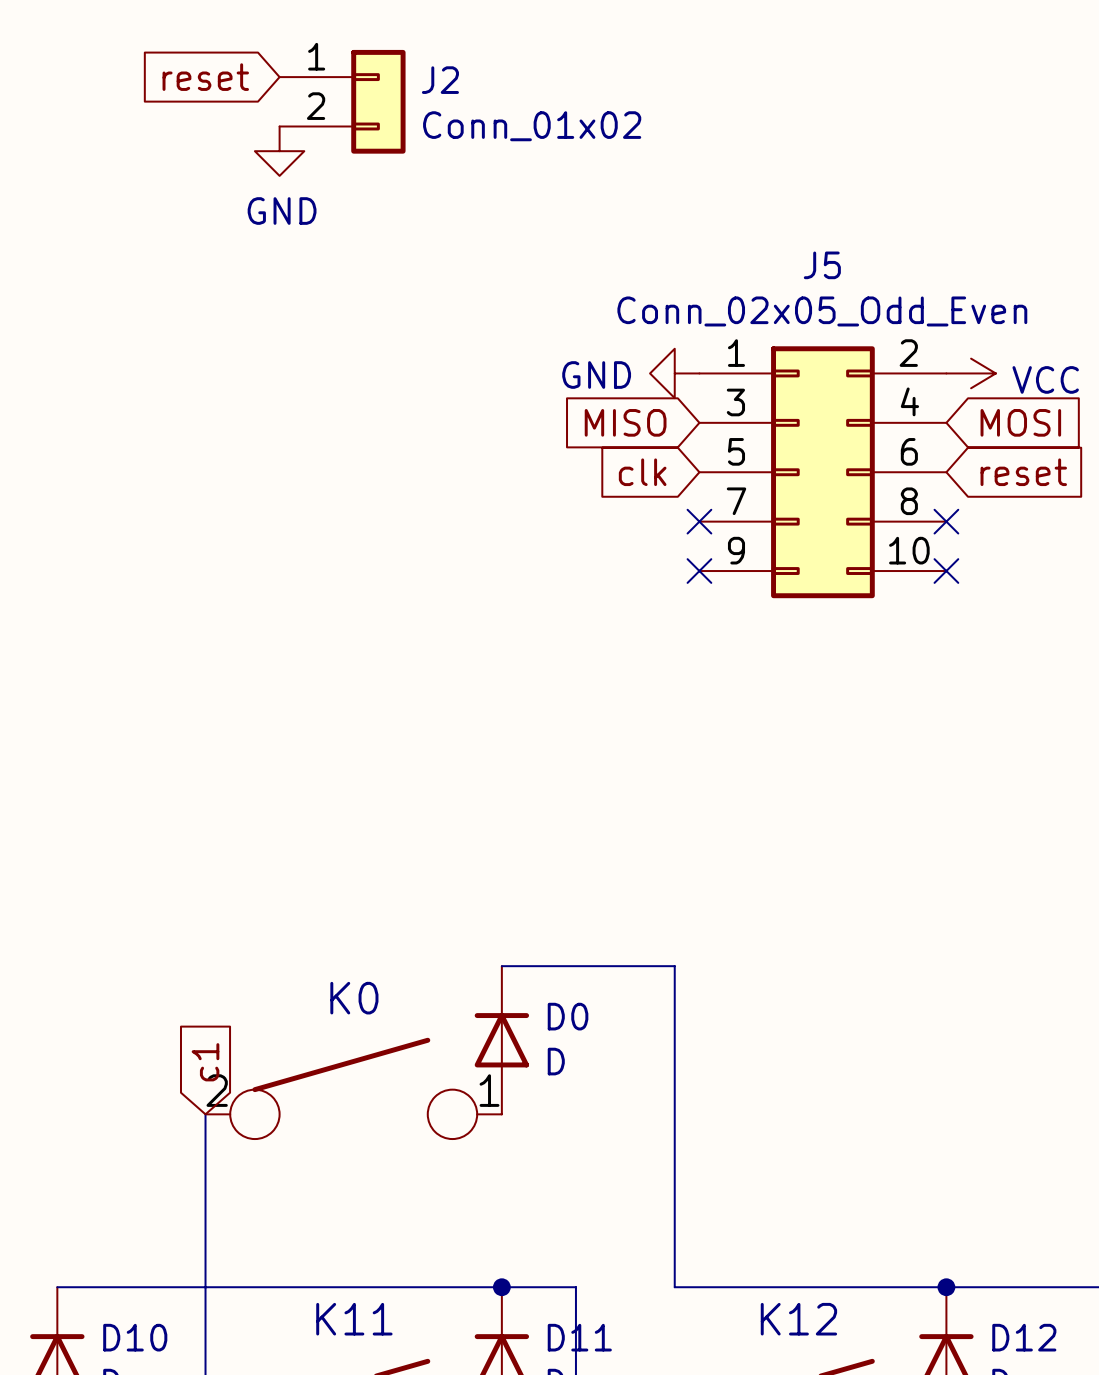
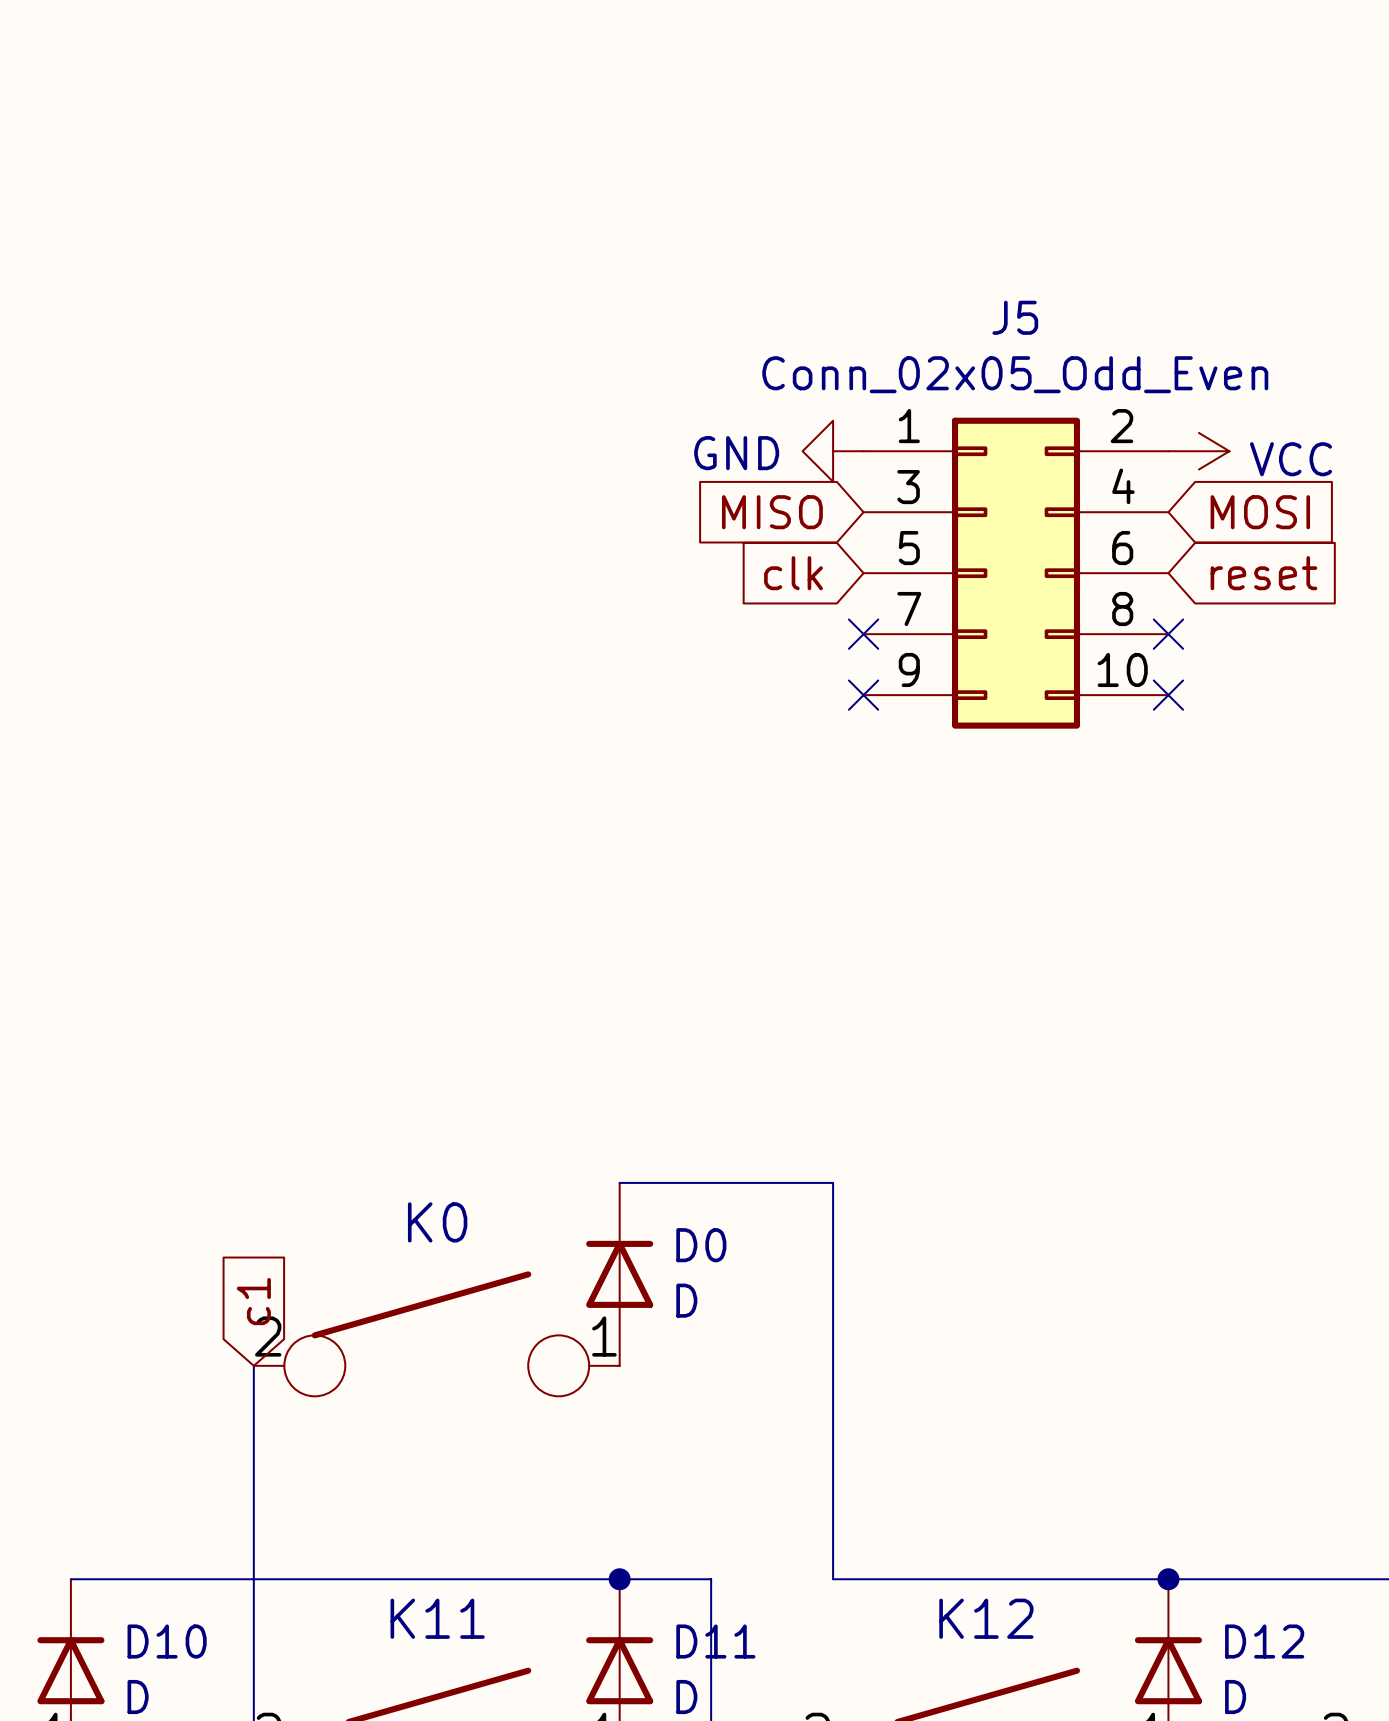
global label: reset (205, 77) -> none
J2: Conn_01x02 (342, 101) -> none
power symbol: GND (279, 151) -> none

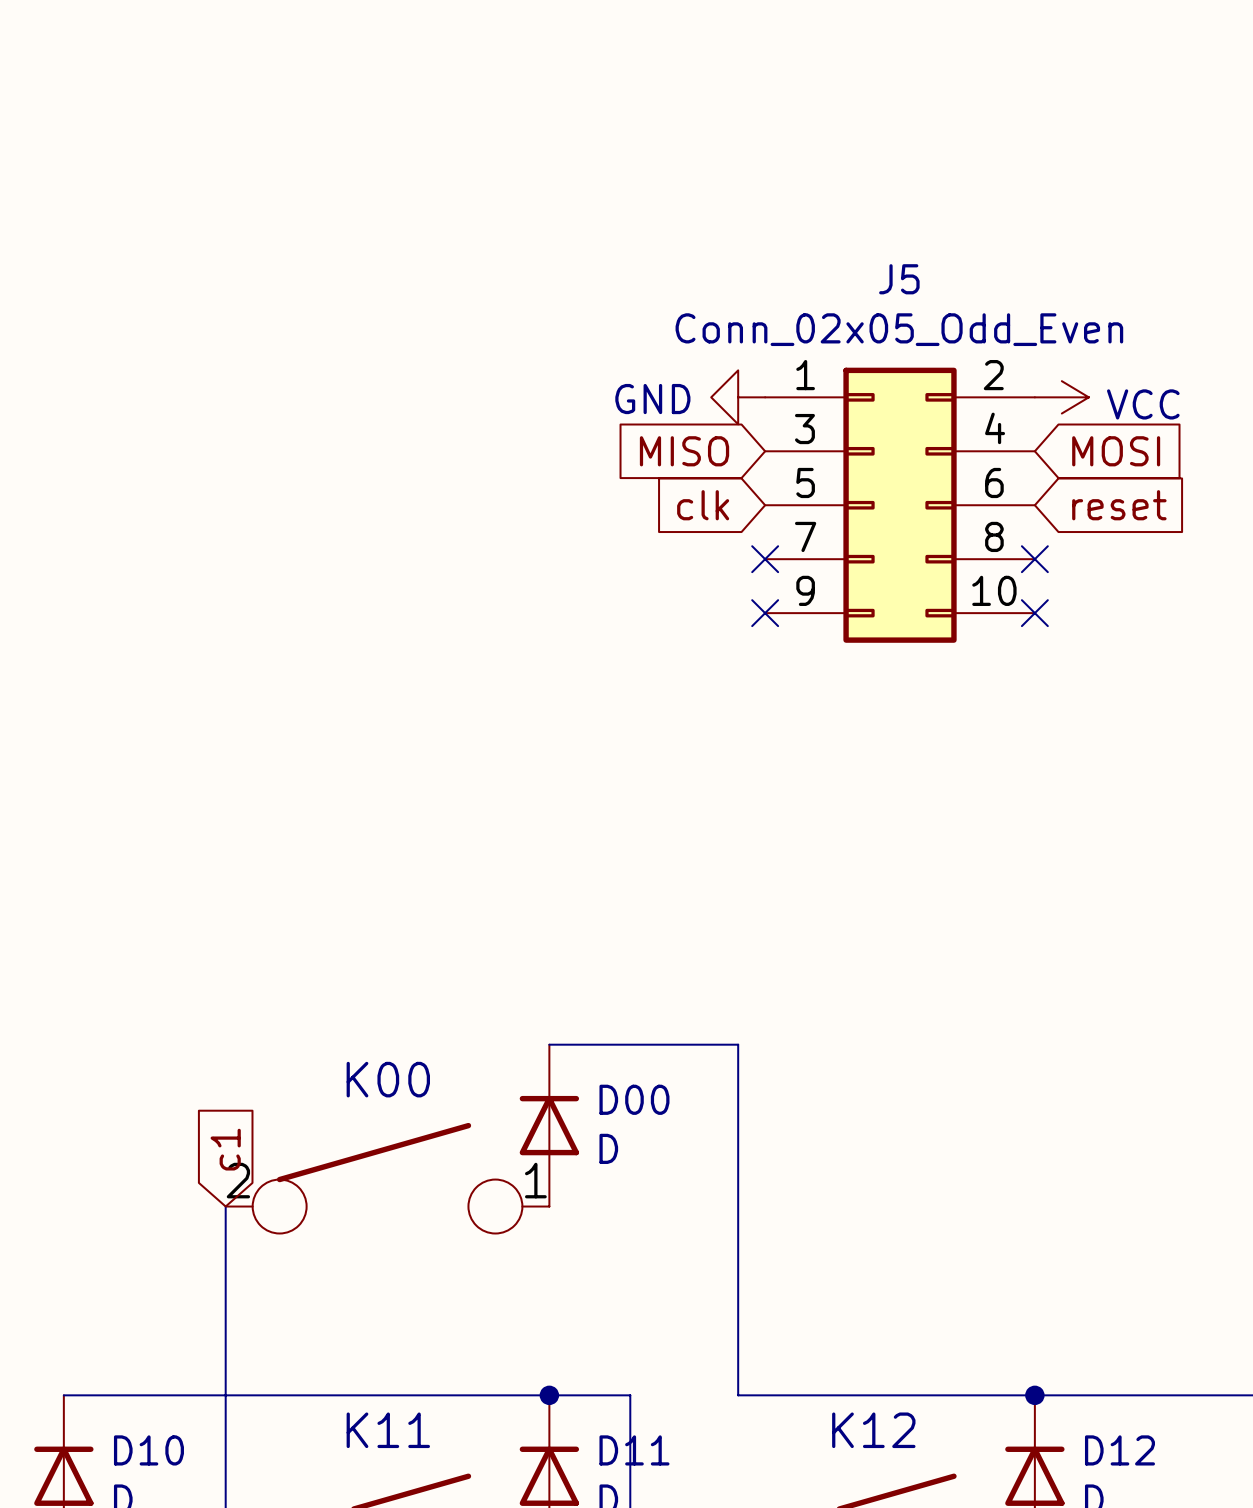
K0 name: K0 (437, 1222) -> K00 (388, 1079)
D0 name: D0 (701, 1245) -> D00 (634, 1099)

